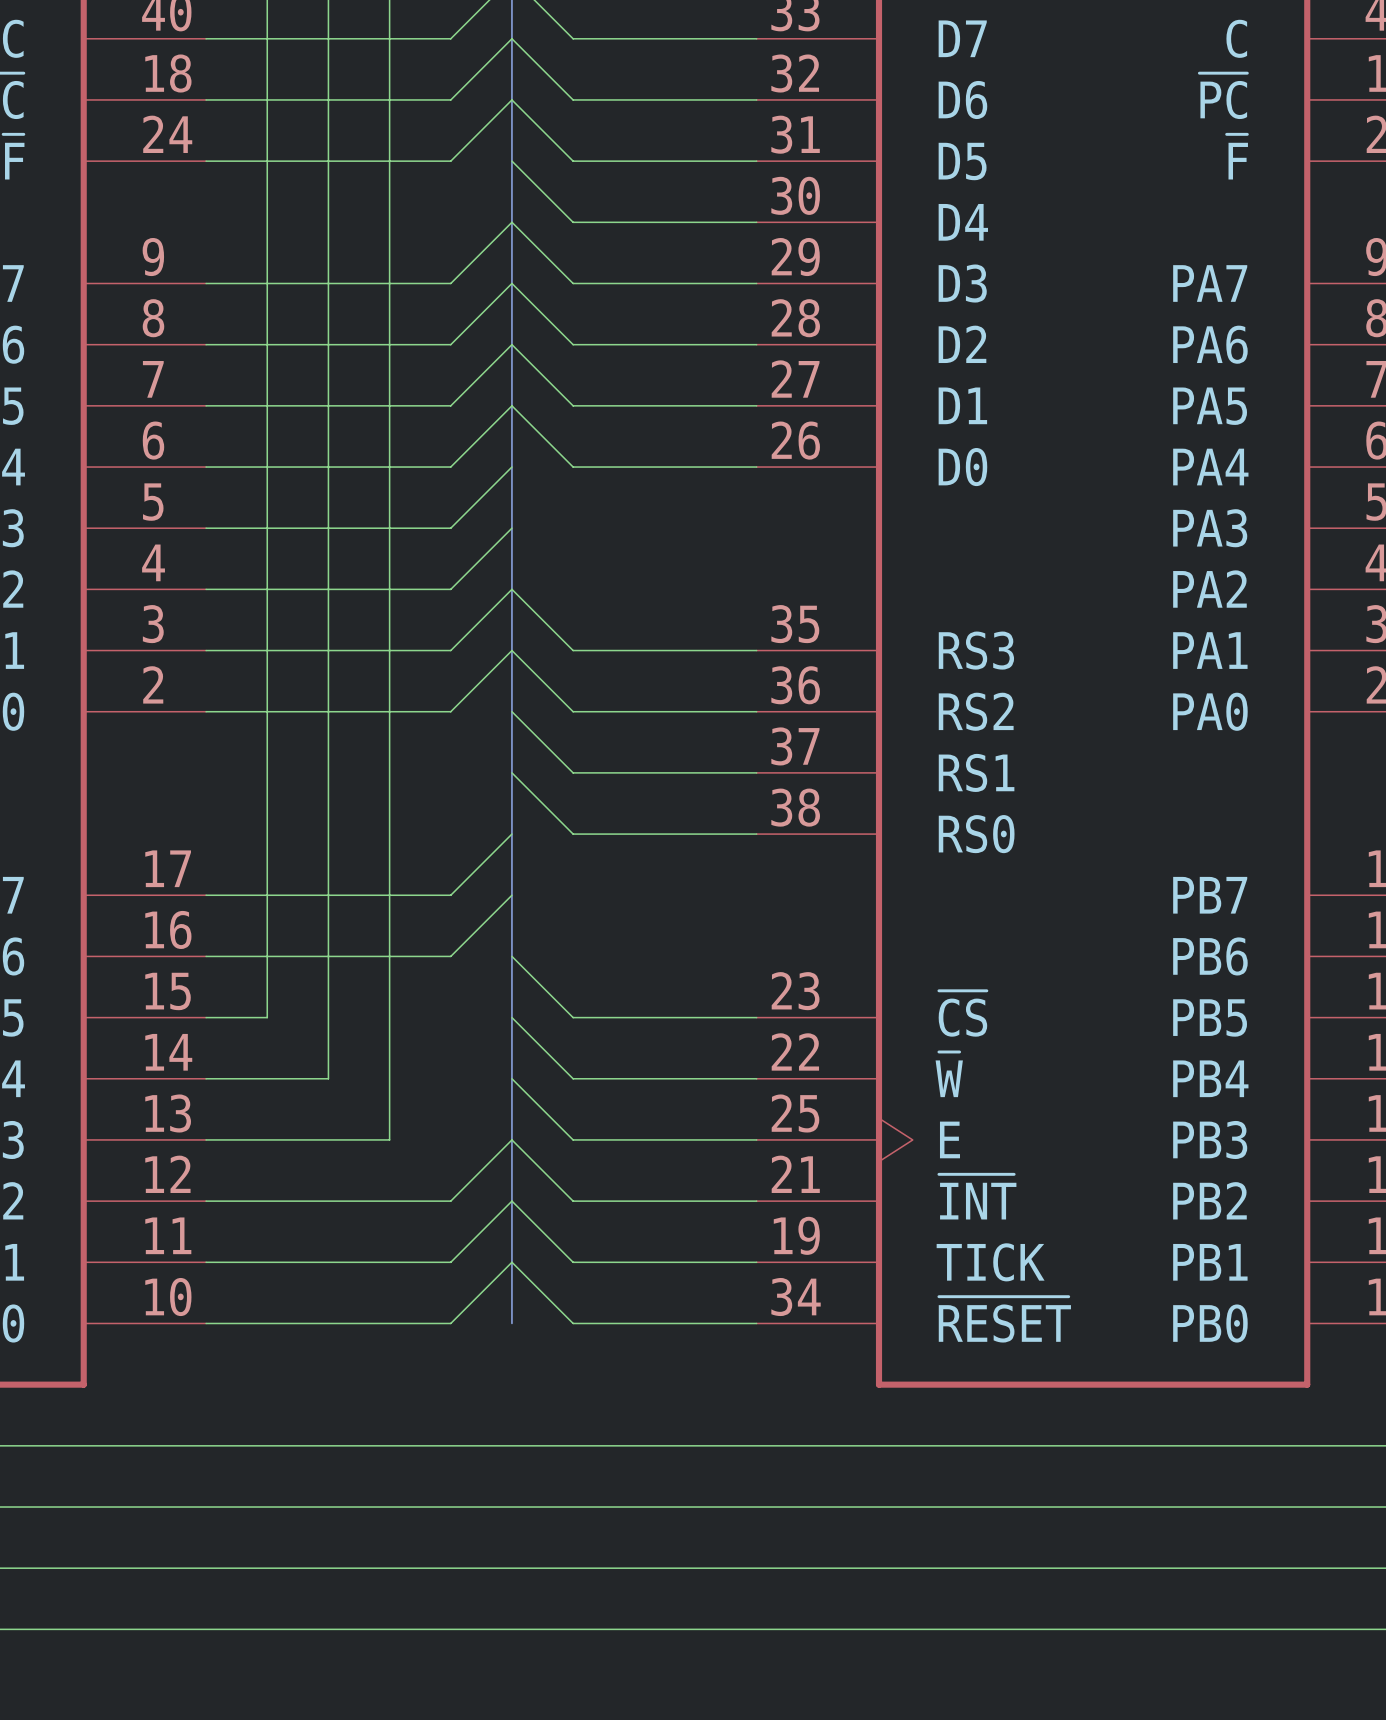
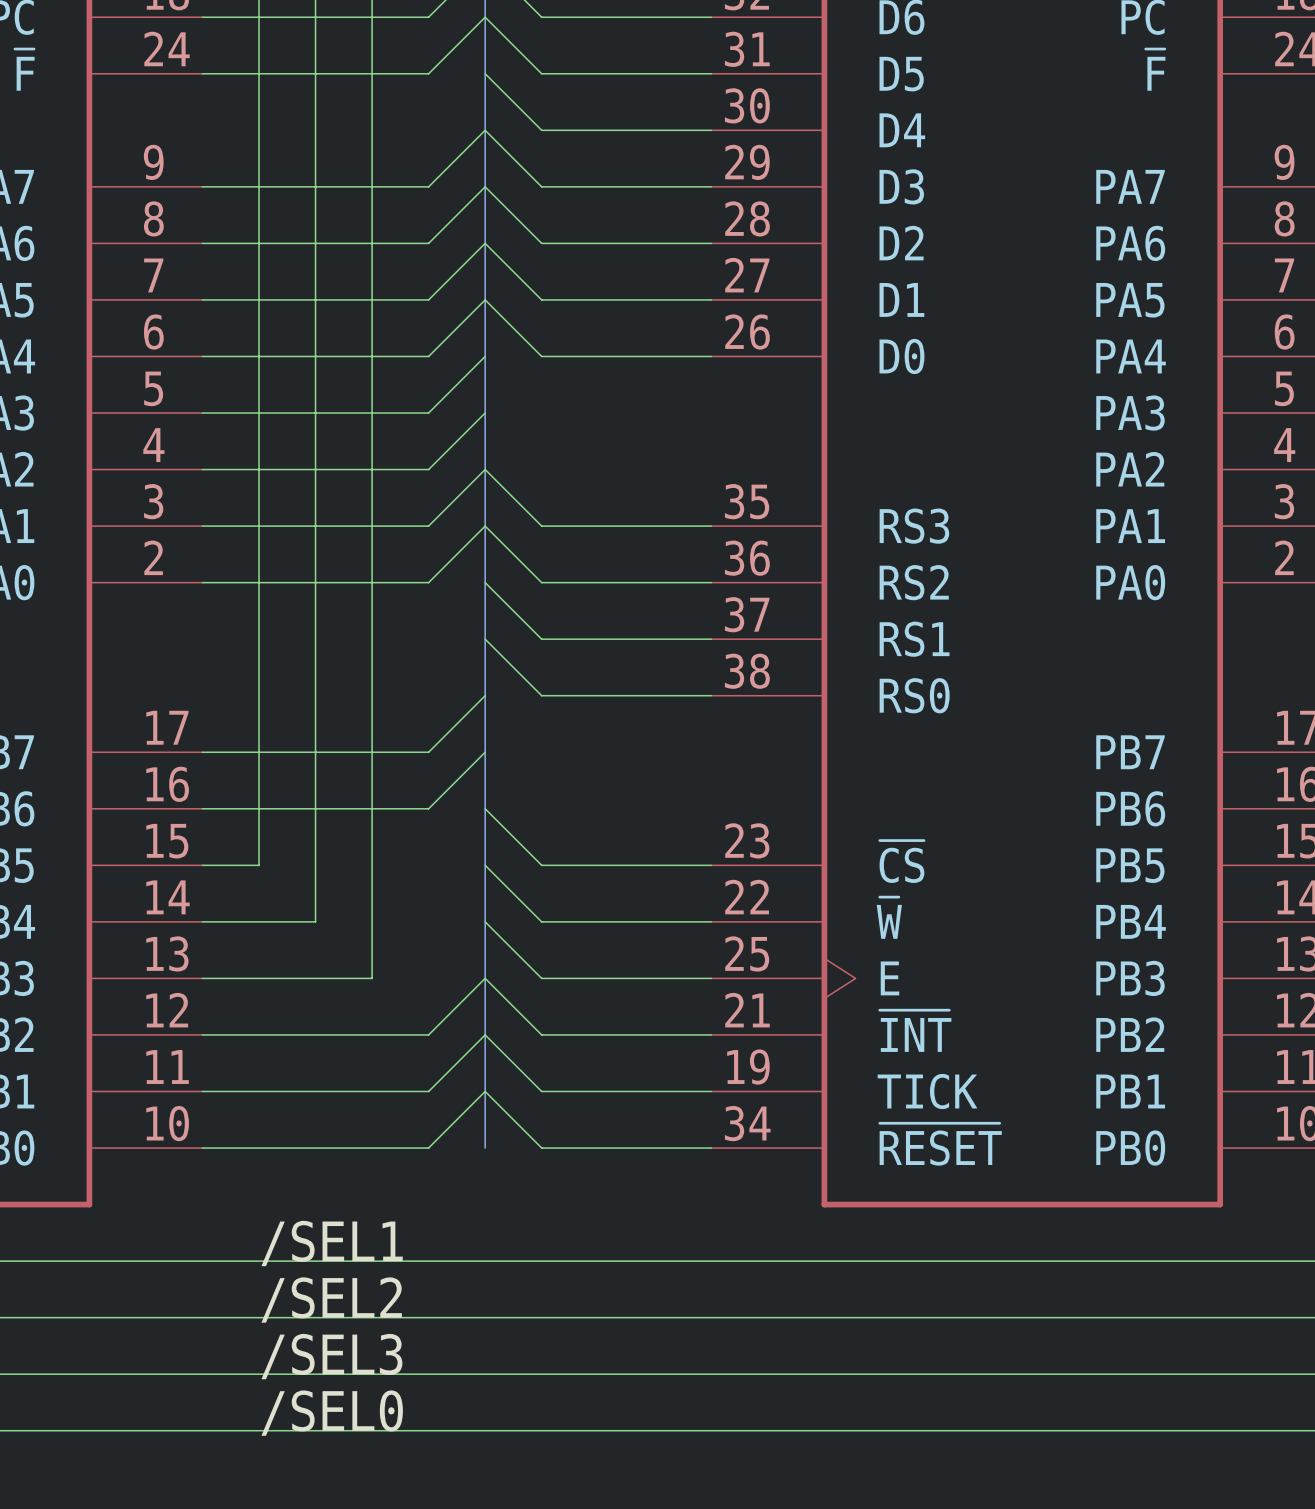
label: none -> /SEL1 (332, 1243)
label: none -> /SEL2 (331, 1300)
label: none -> /SEL3 (331, 1356)
label: none -> /SEL0 (332, 1413)

